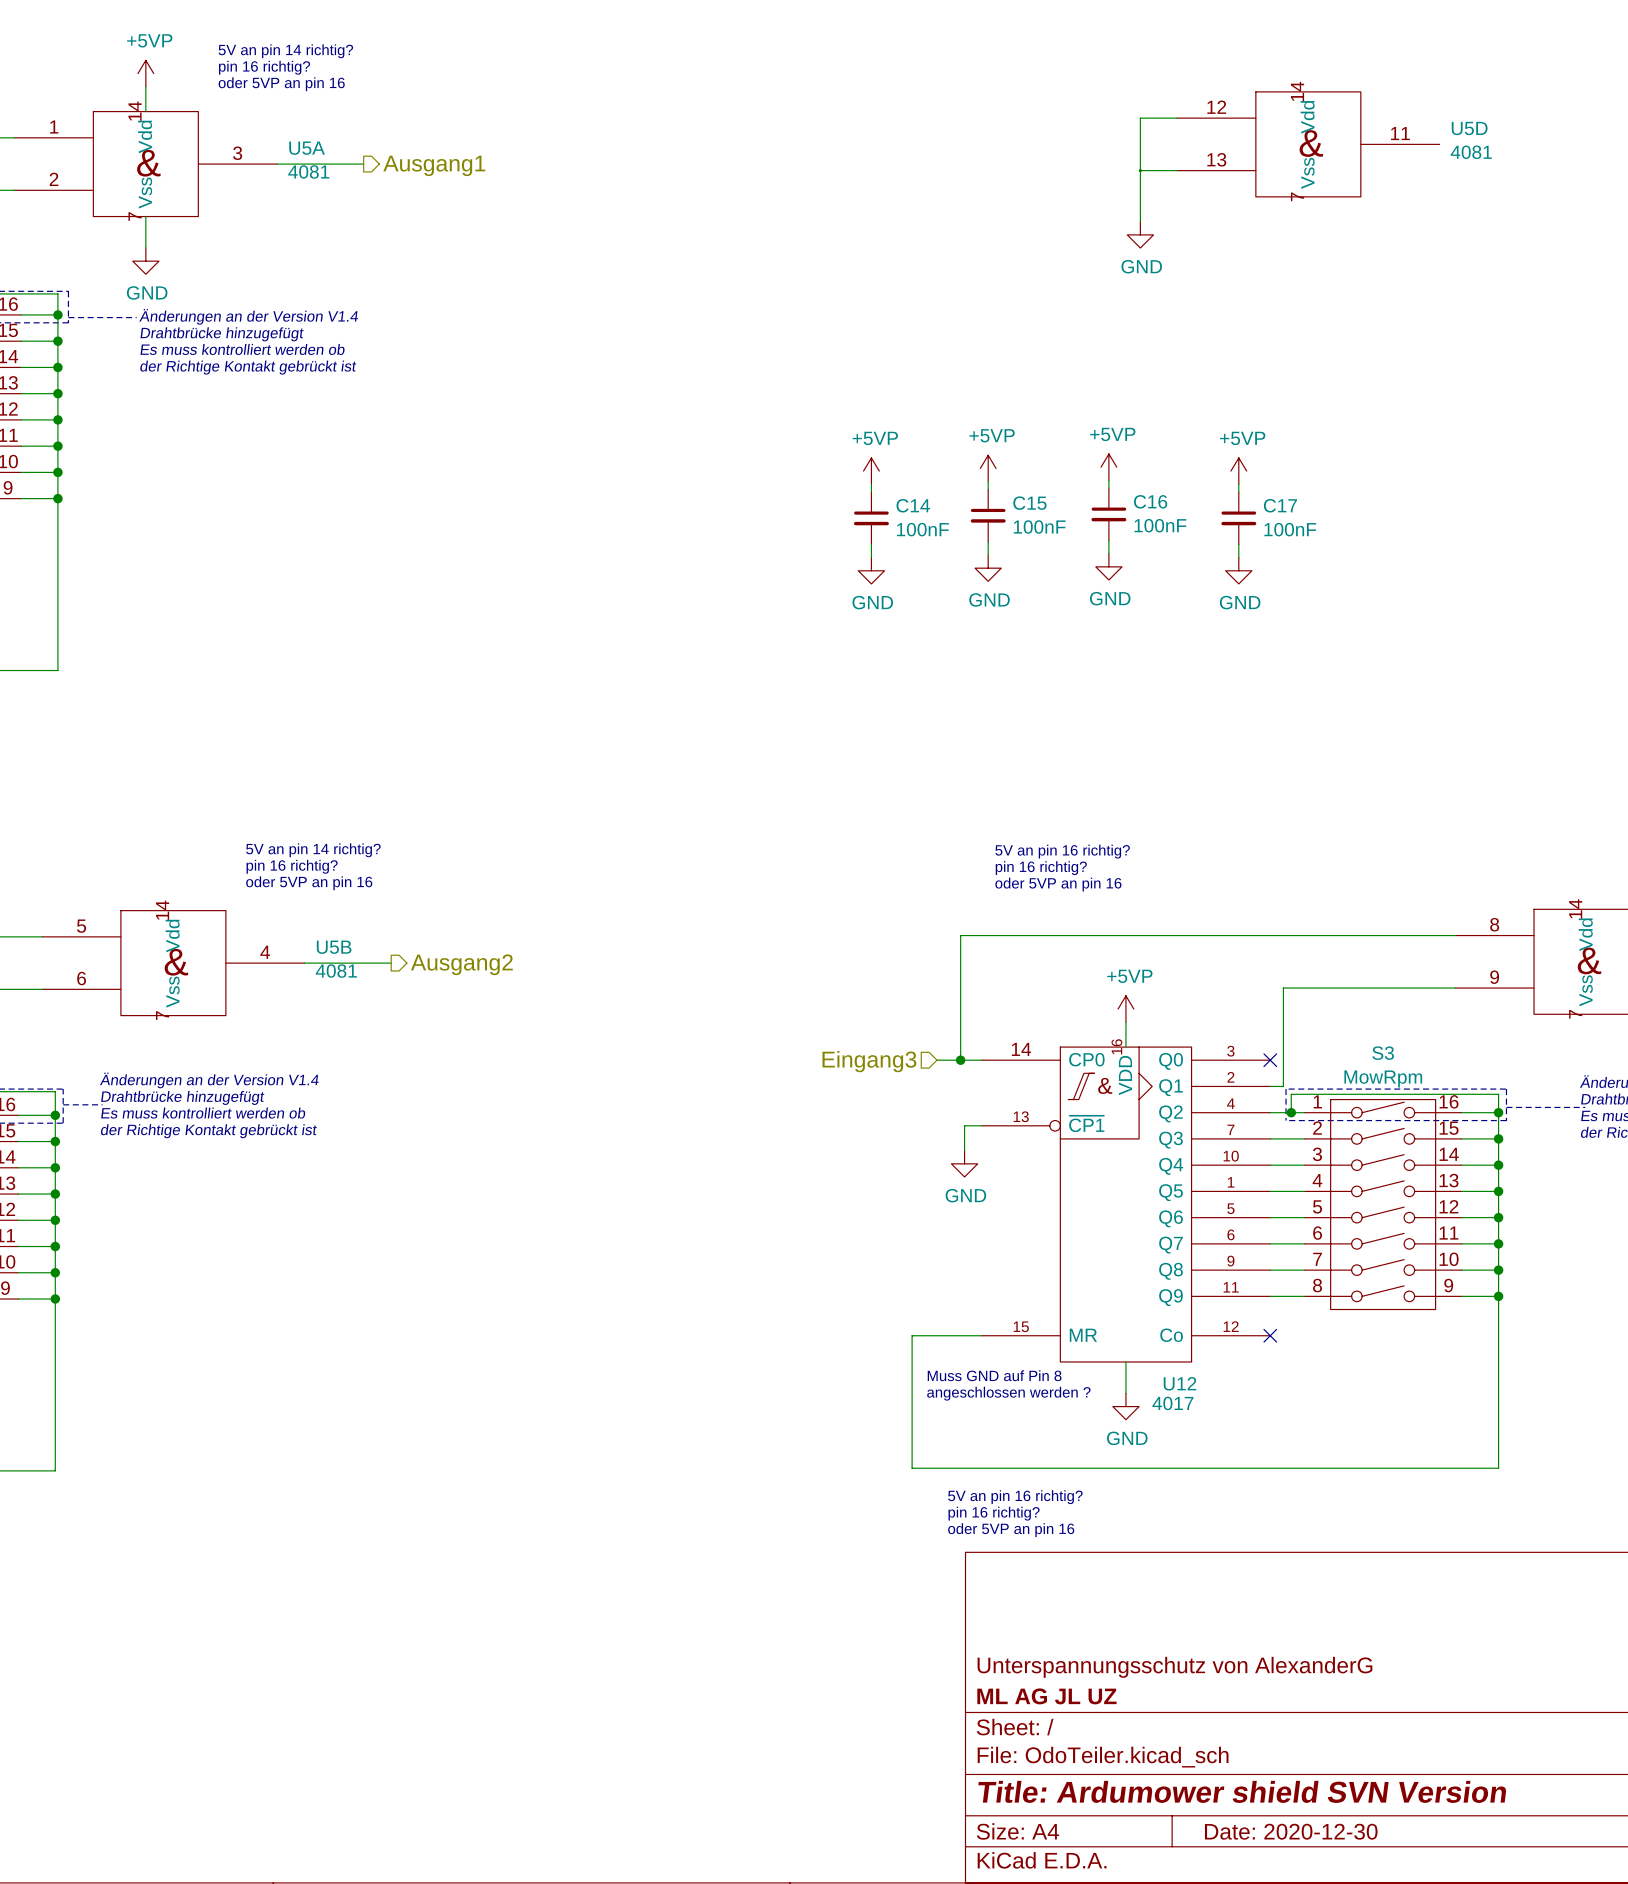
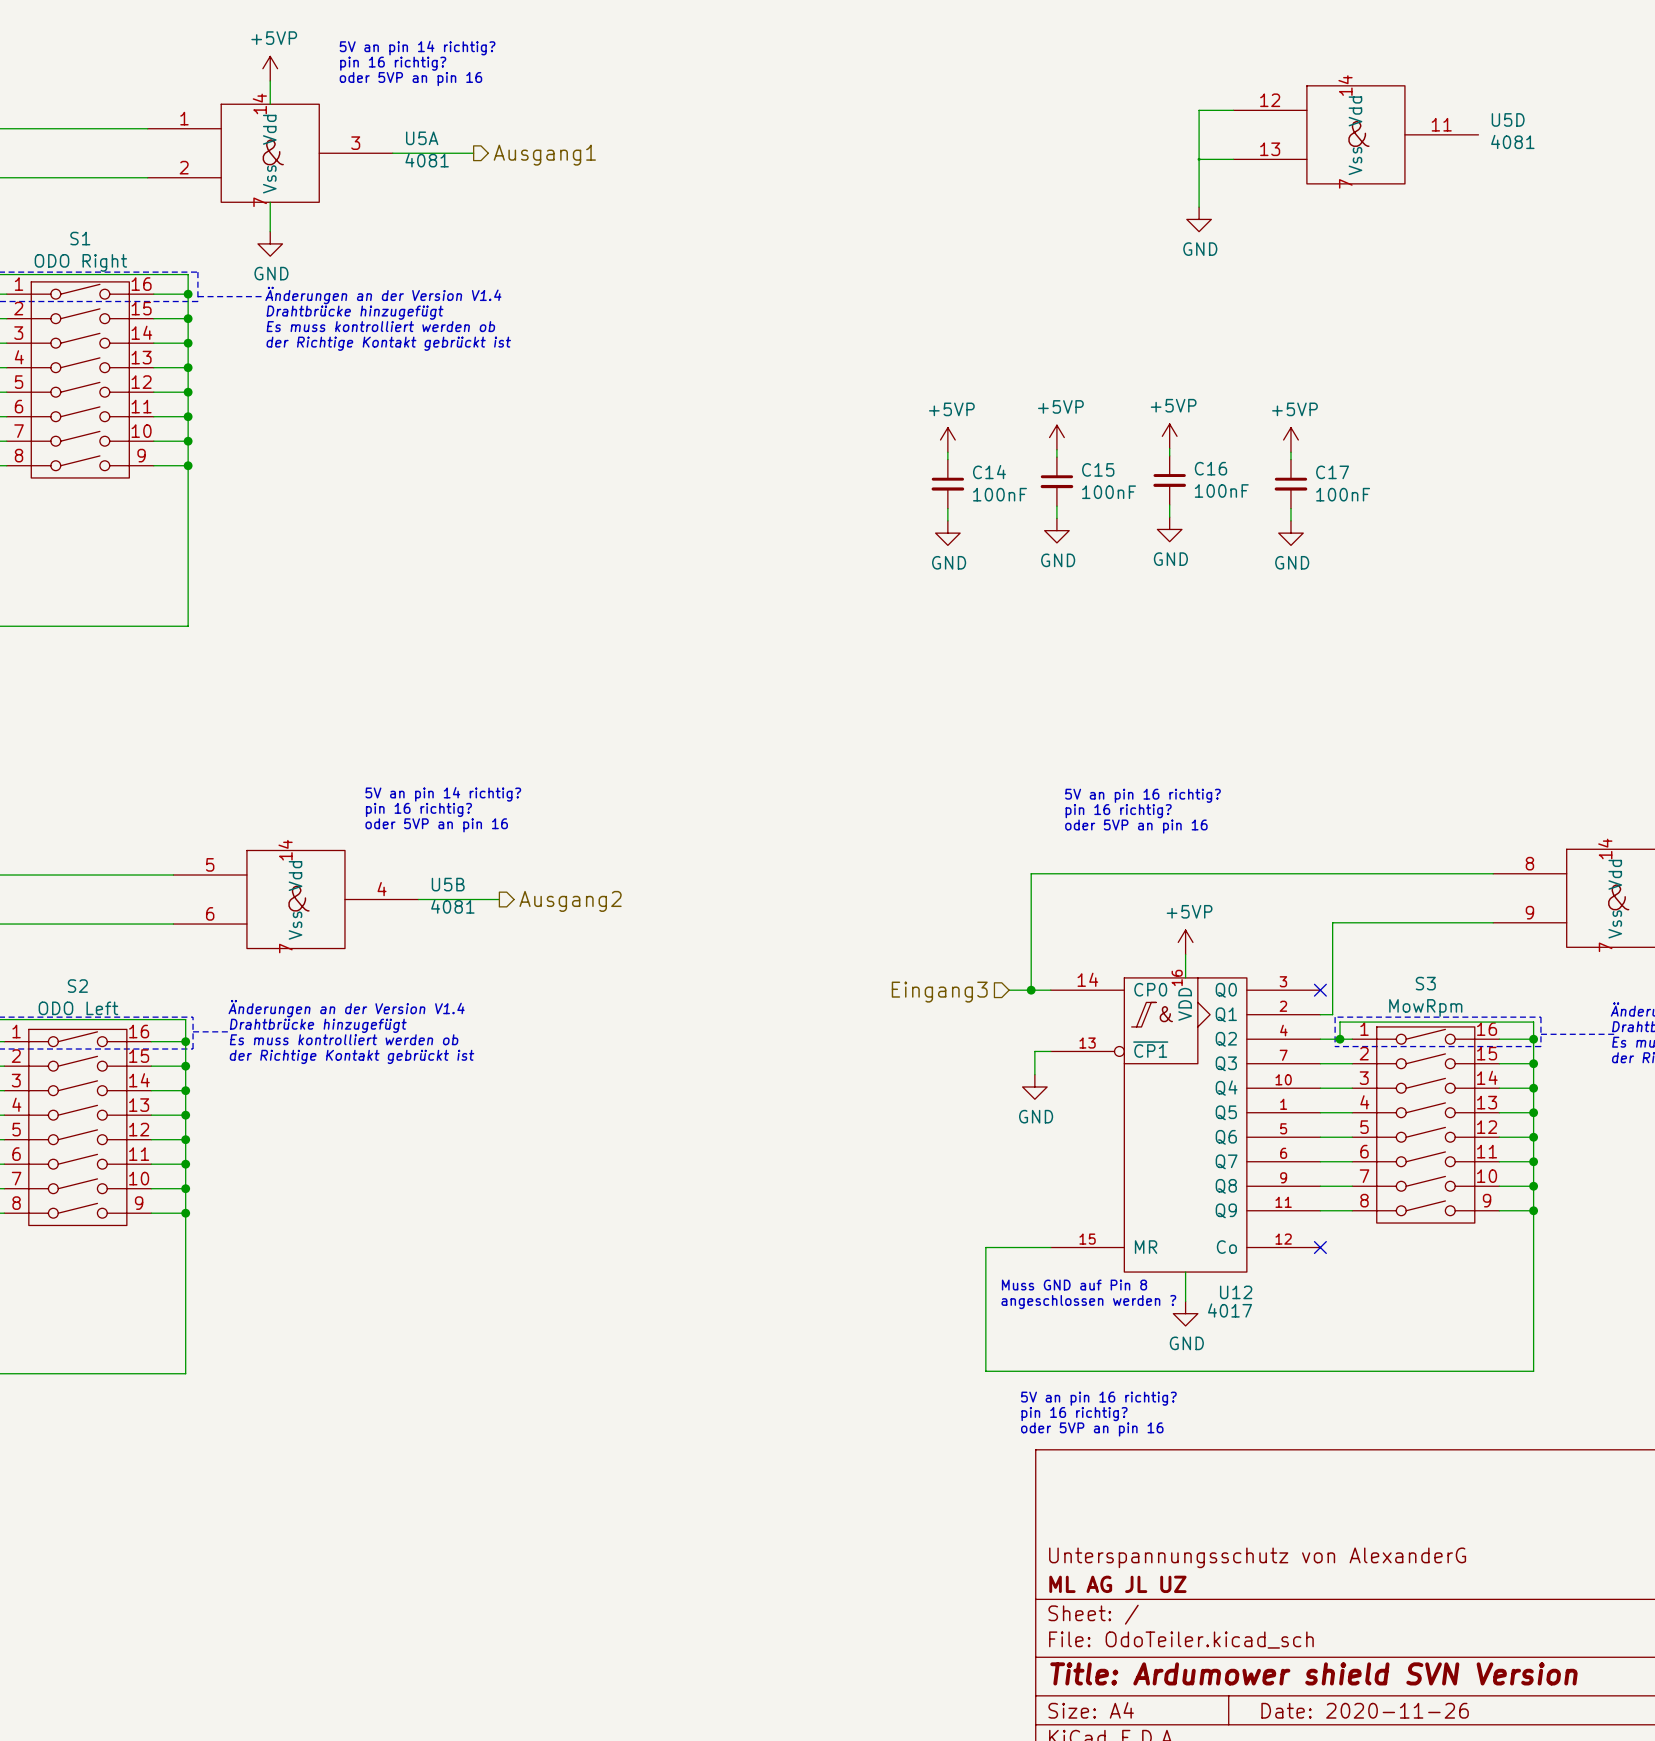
title block: Date: 2020-12-30 (1291, 1831) -> Date: 2020-11-26 (1365, 1710)

